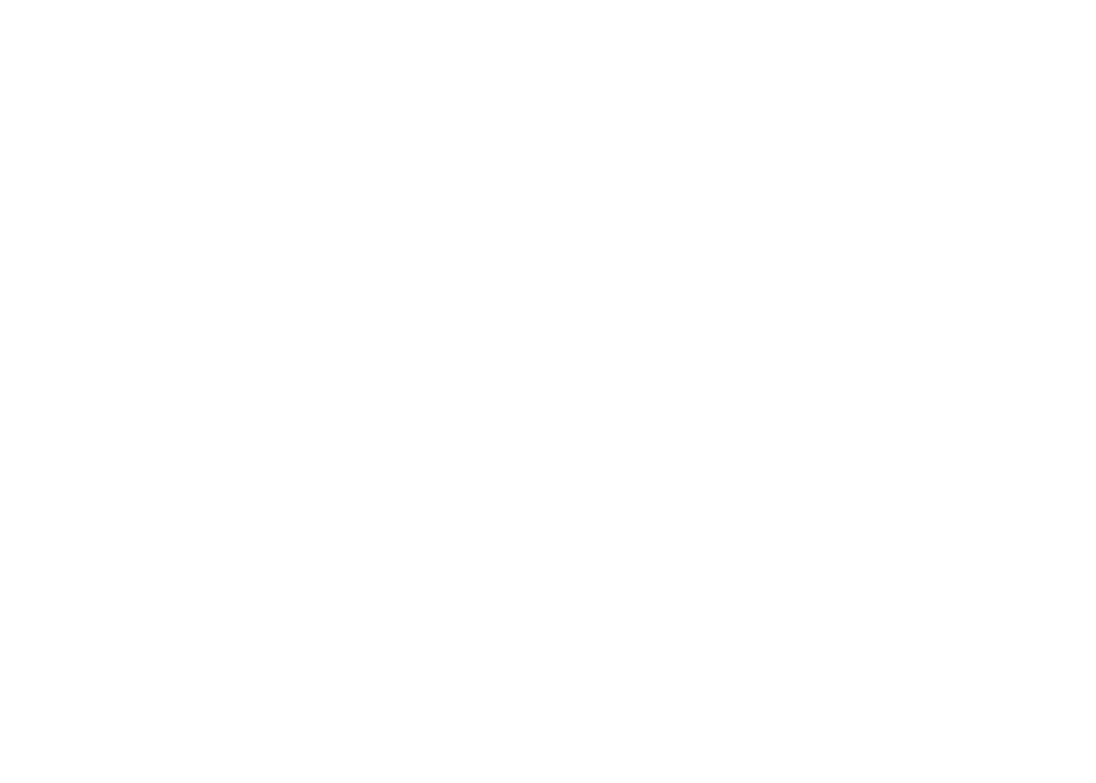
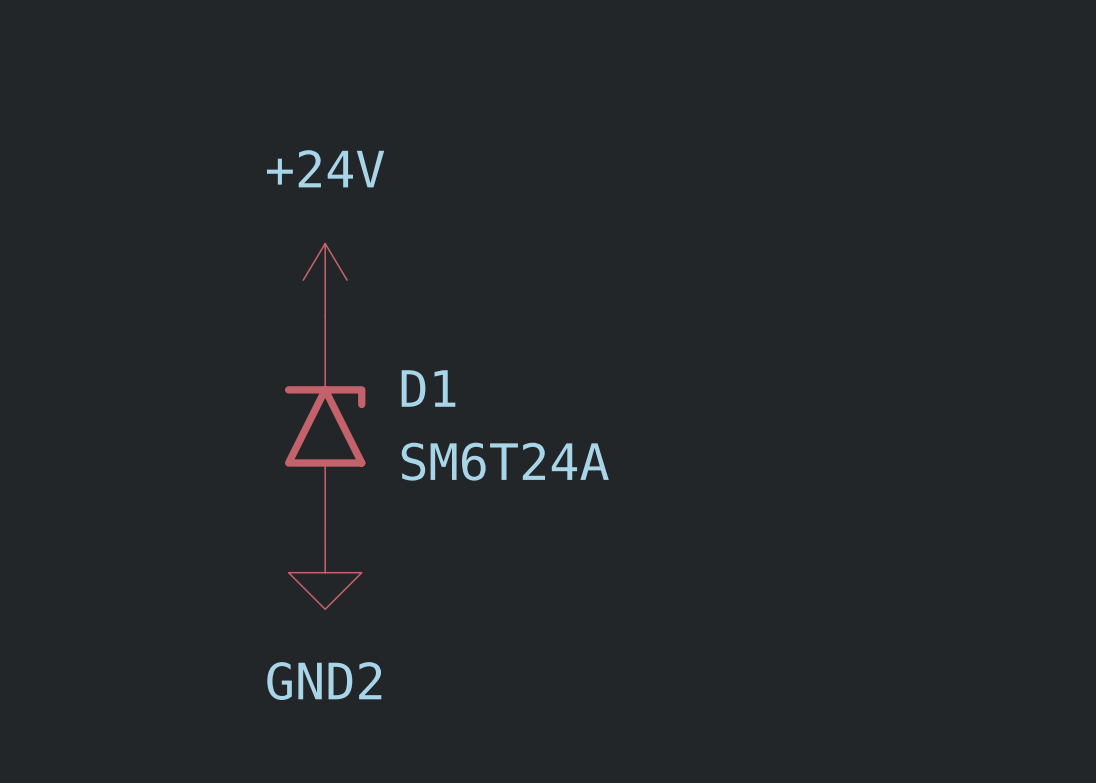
power symbol: none -> +24V (325, 280)
D1: none -> SM6T24A (325, 426)
power symbol: none -> GND2 (325, 572)

